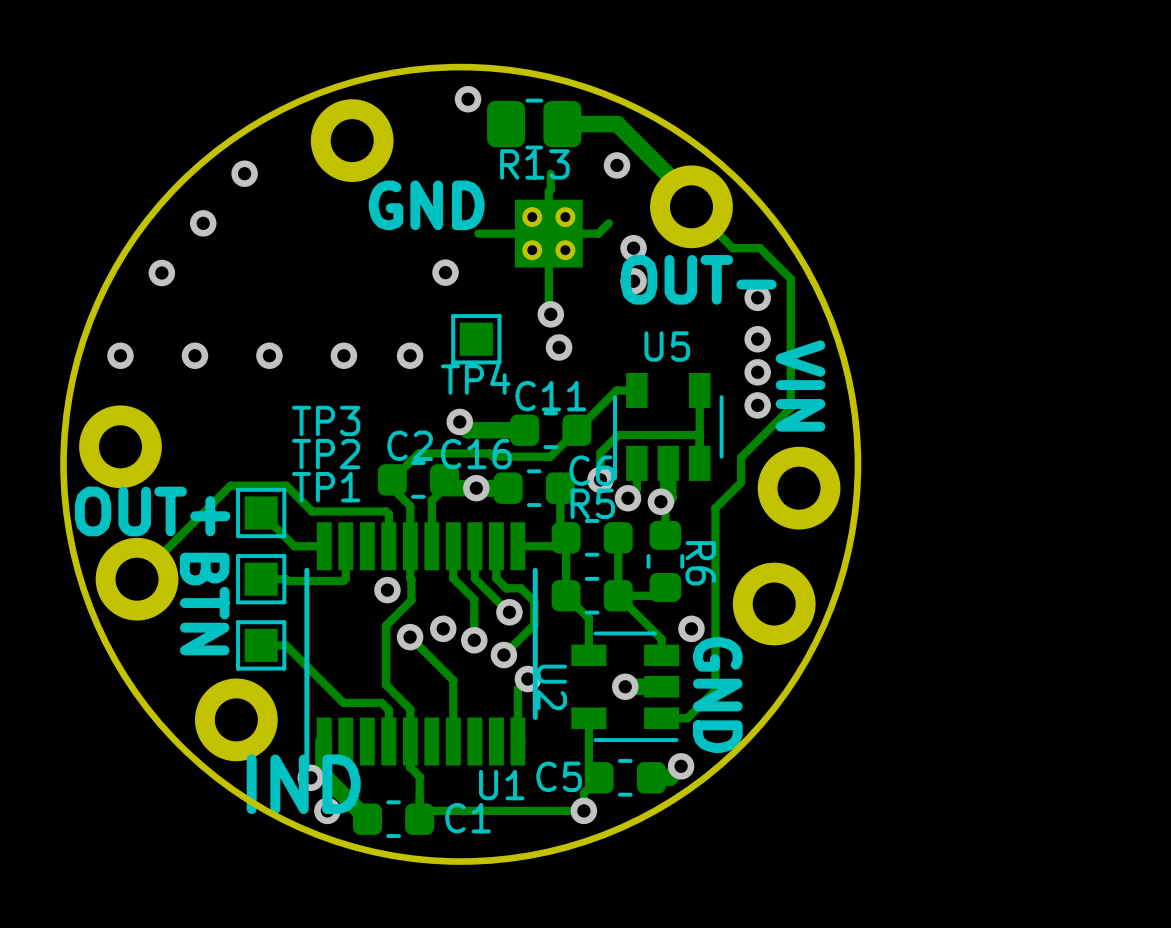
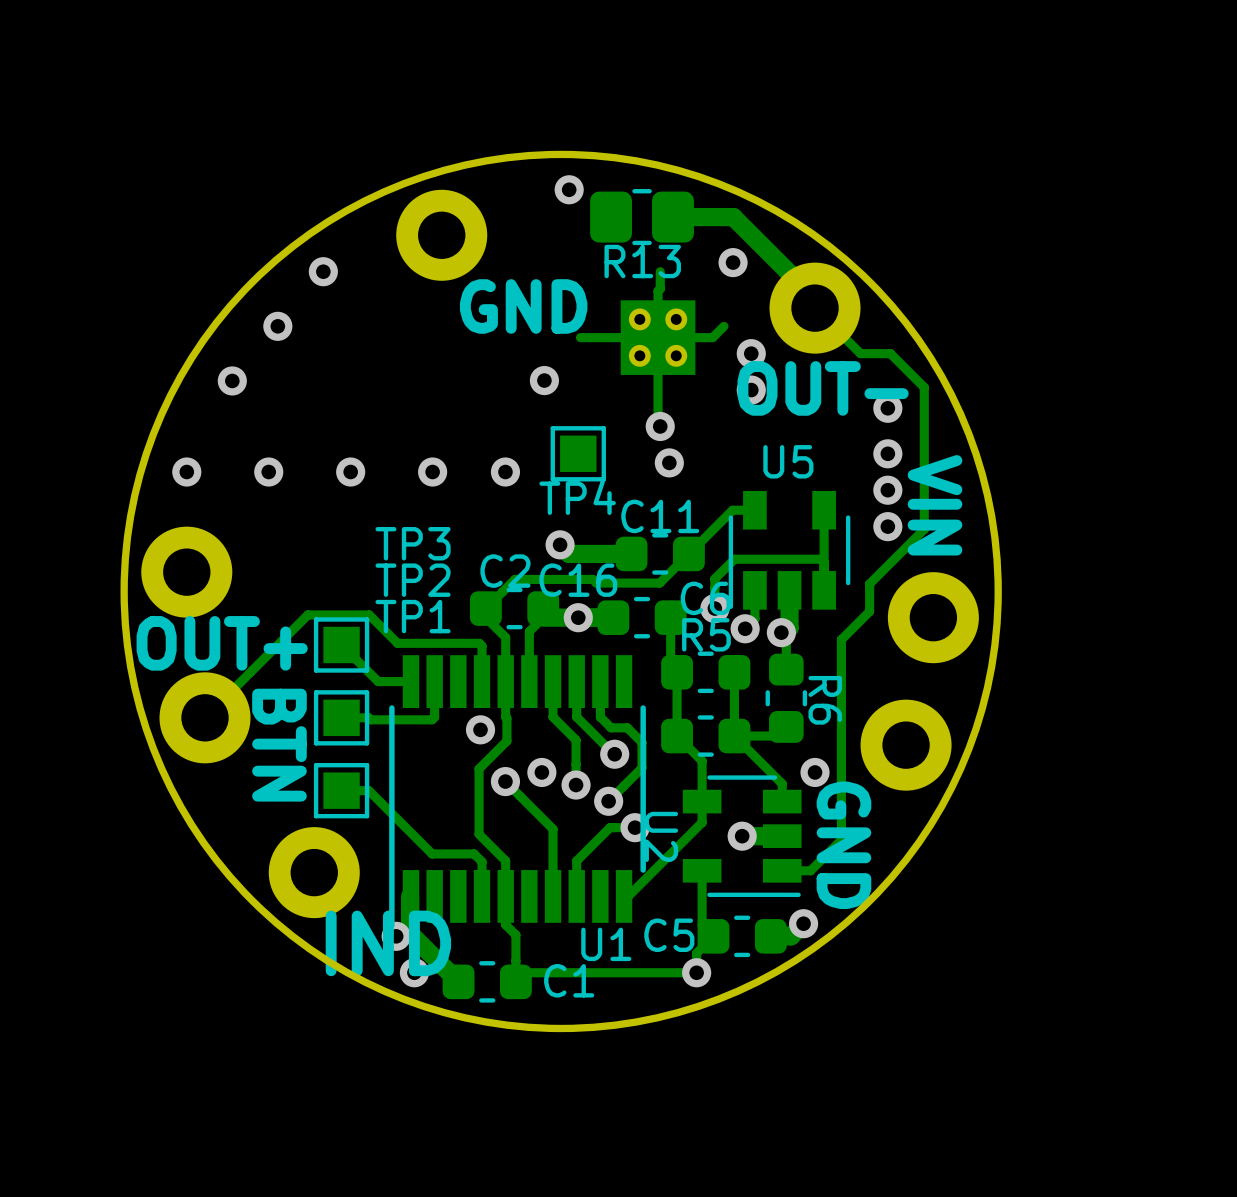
track: (566, 537) (557, 546) (517, 546) -> none
track: none -> (702, 801) (702, 822) (628, 896)
track: (527, 679) (517, 689) (517, 741) -> (635, 827) (609, 827) (576, 860) (576, 896)

